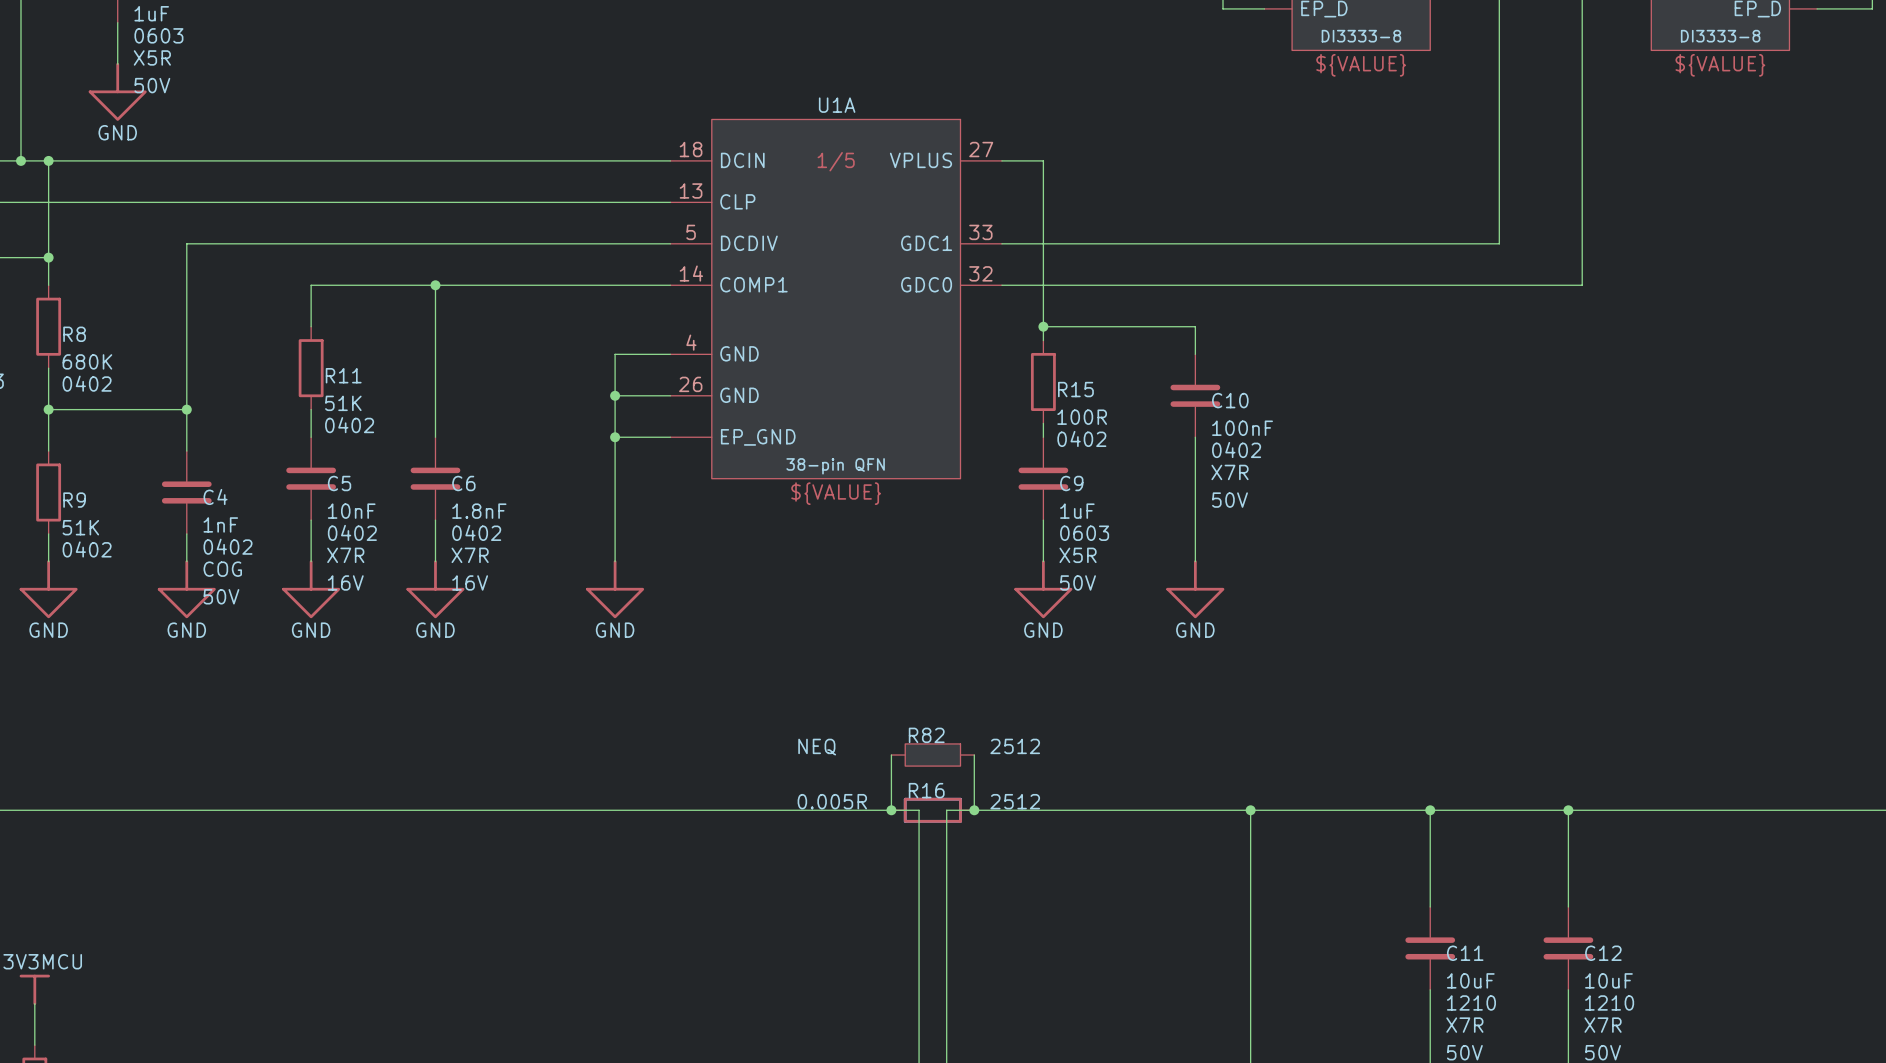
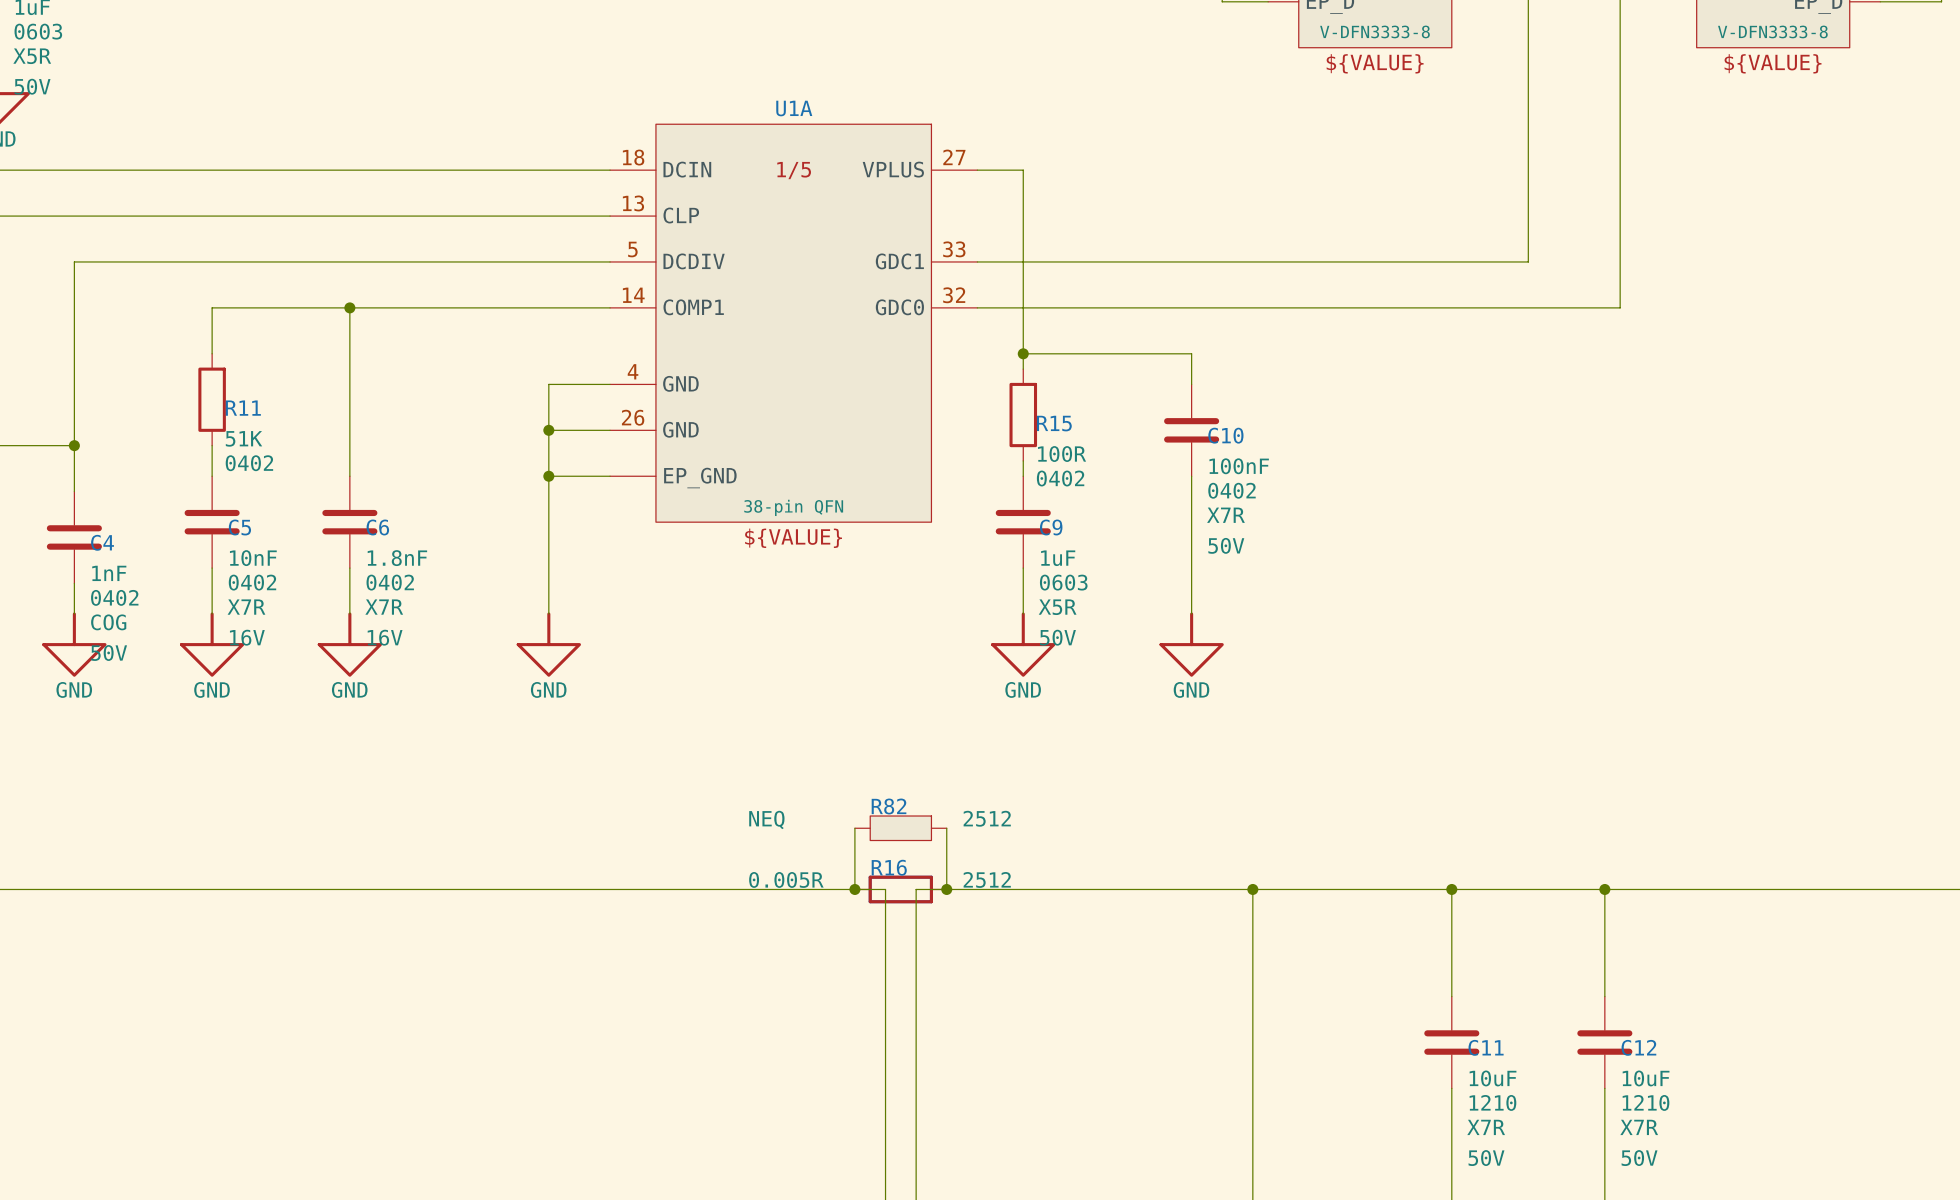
part text: DI3333-8 (1361, 36) -> V-DFN3333-8 (1374, 31)
part text: DI3333-8 (1720, 36) -> V-DFN3333-8 (1772, 31)

